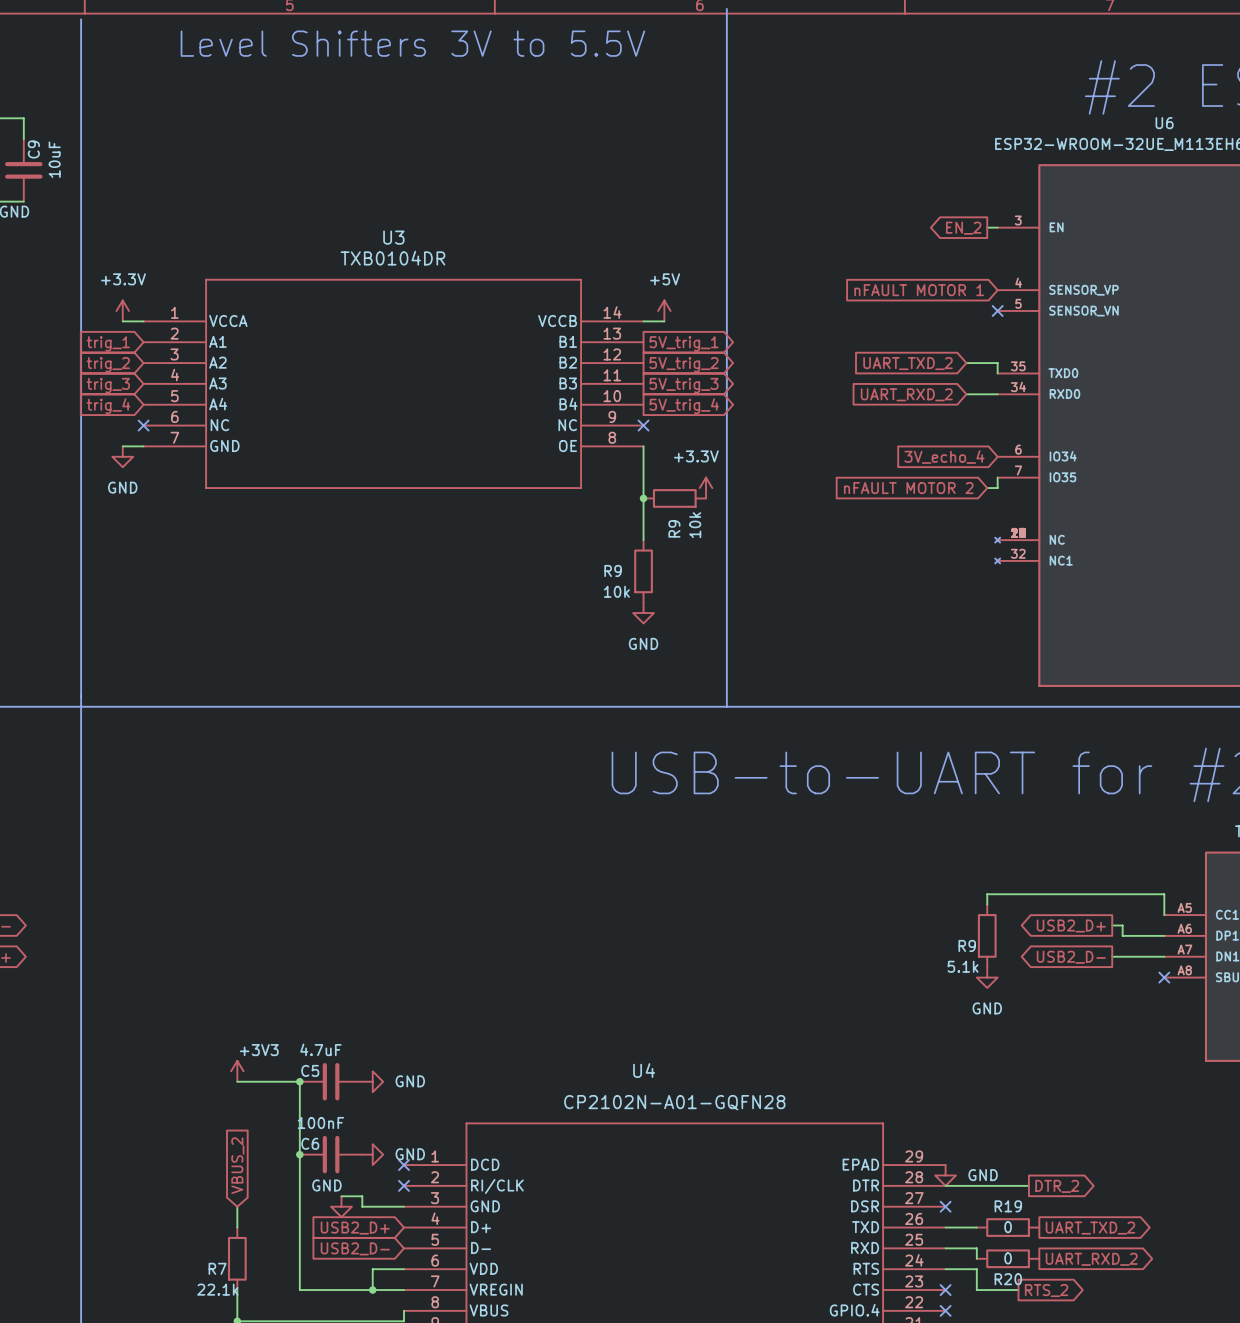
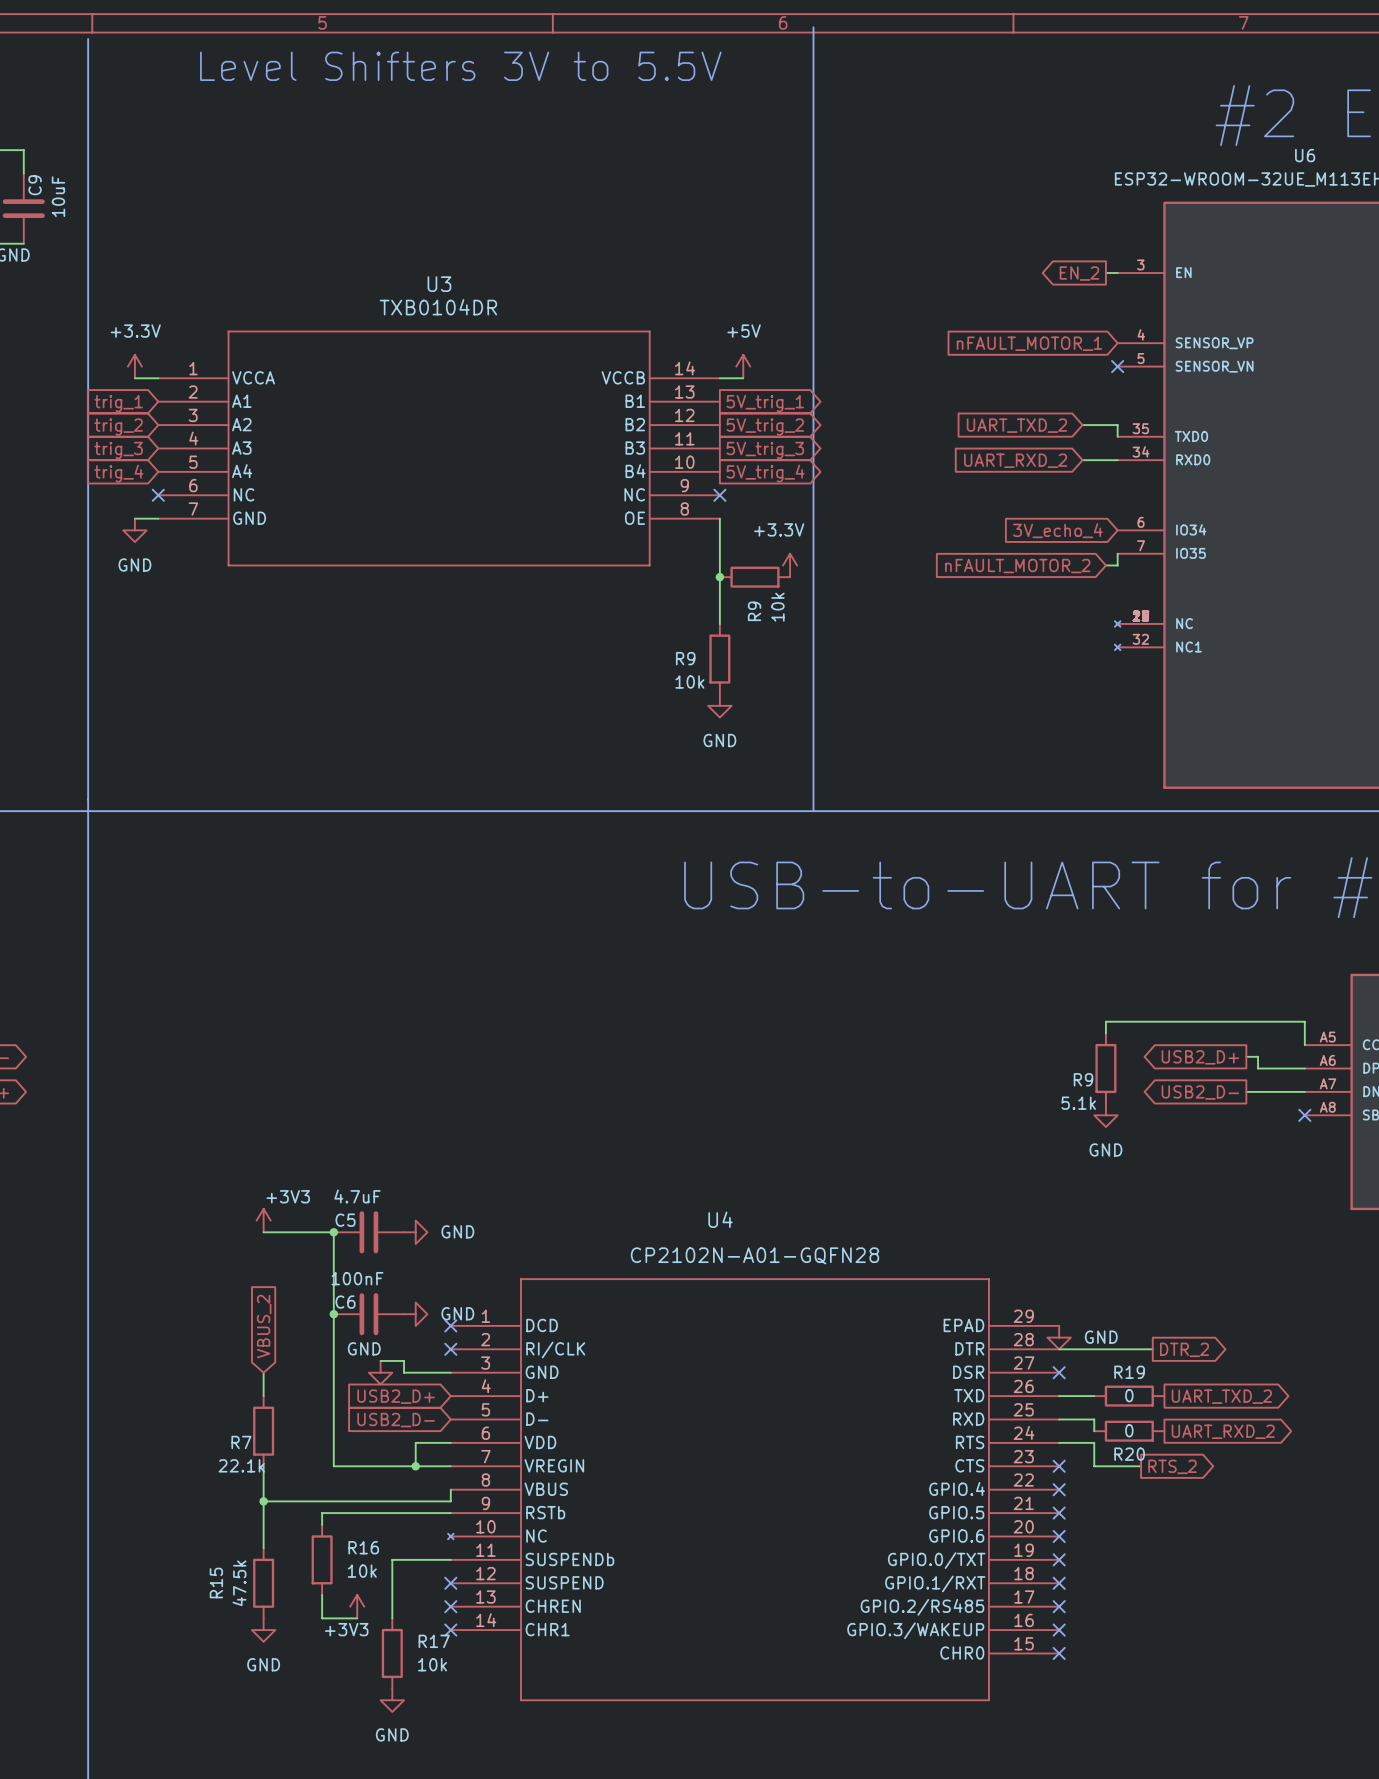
global label: nFAULT MOTOR 1 (919, 290) -> nFAULT_MOTOR_1 (1029, 343)
global label: nFAULT MOTOR 2 (908, 488) -> nFAULT_MOTOR_2 (1017, 566)

